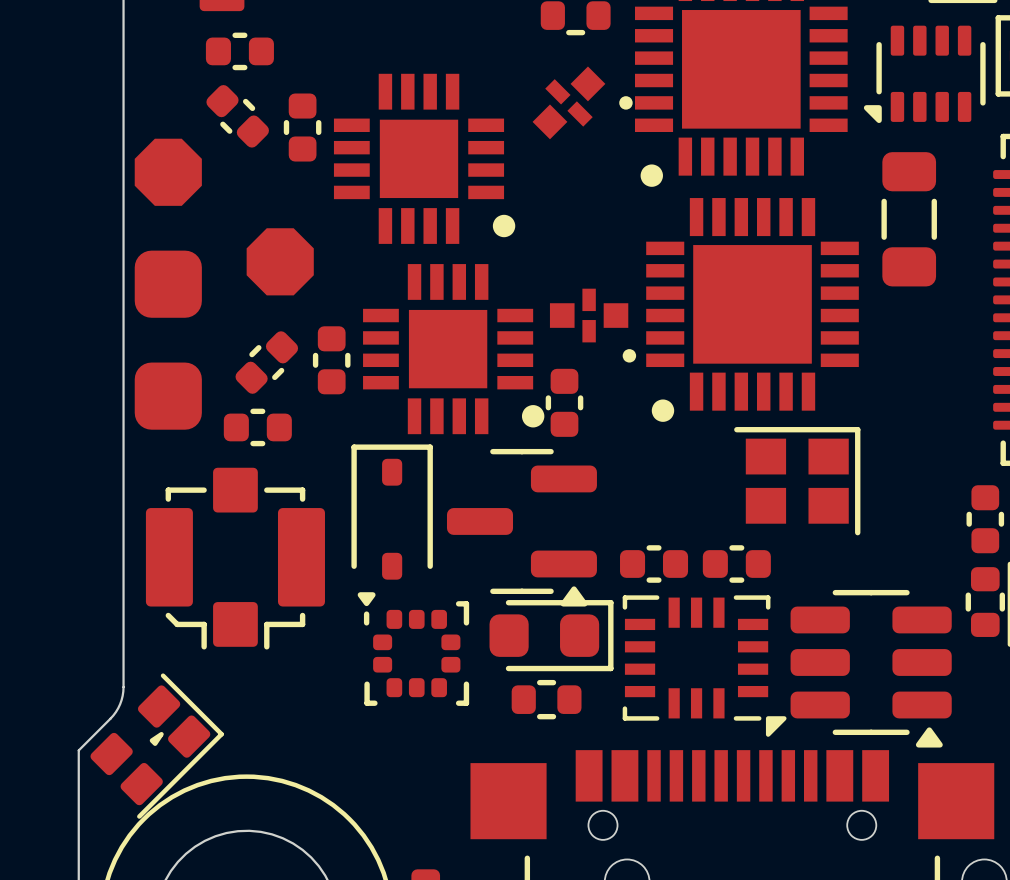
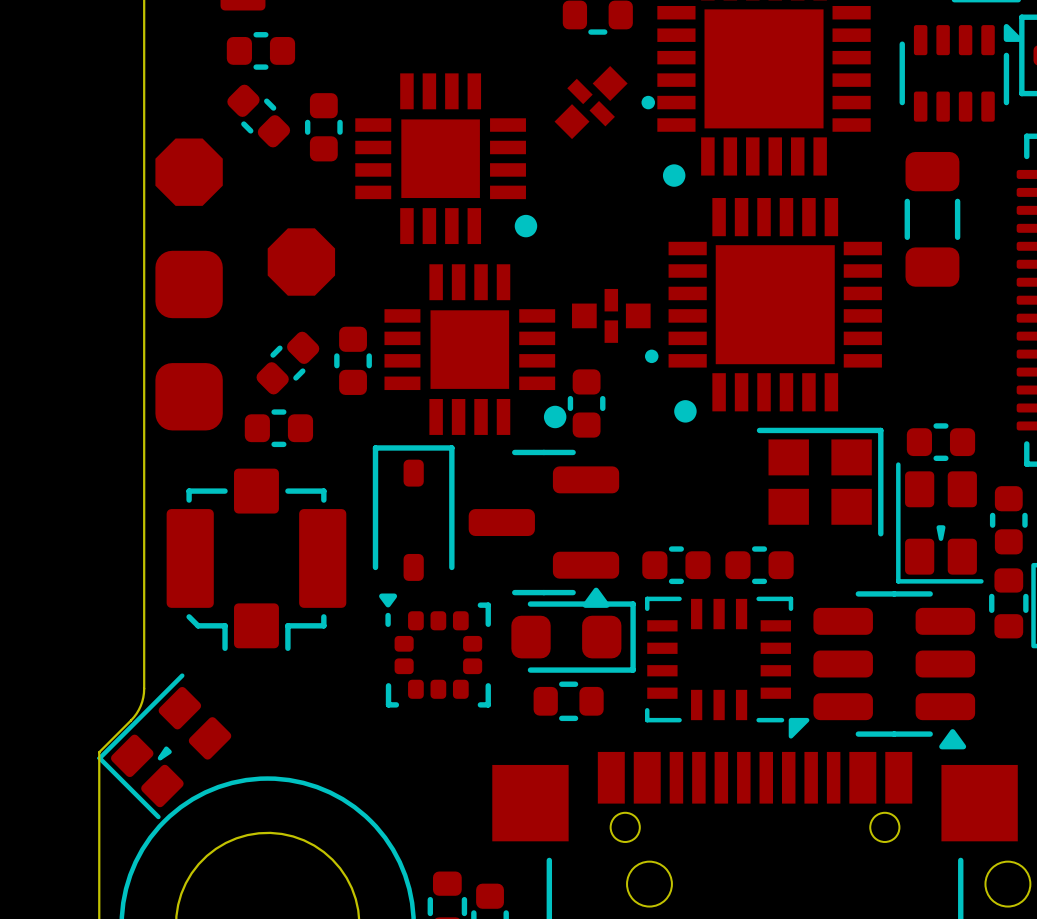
part rotation: 0° (924, 74) -> 180° (960, 72)
part: none -> (940, 442)
part: none -> (939, 522)
part rotation: 0° (157, 746) -> 180° (164, 746)

